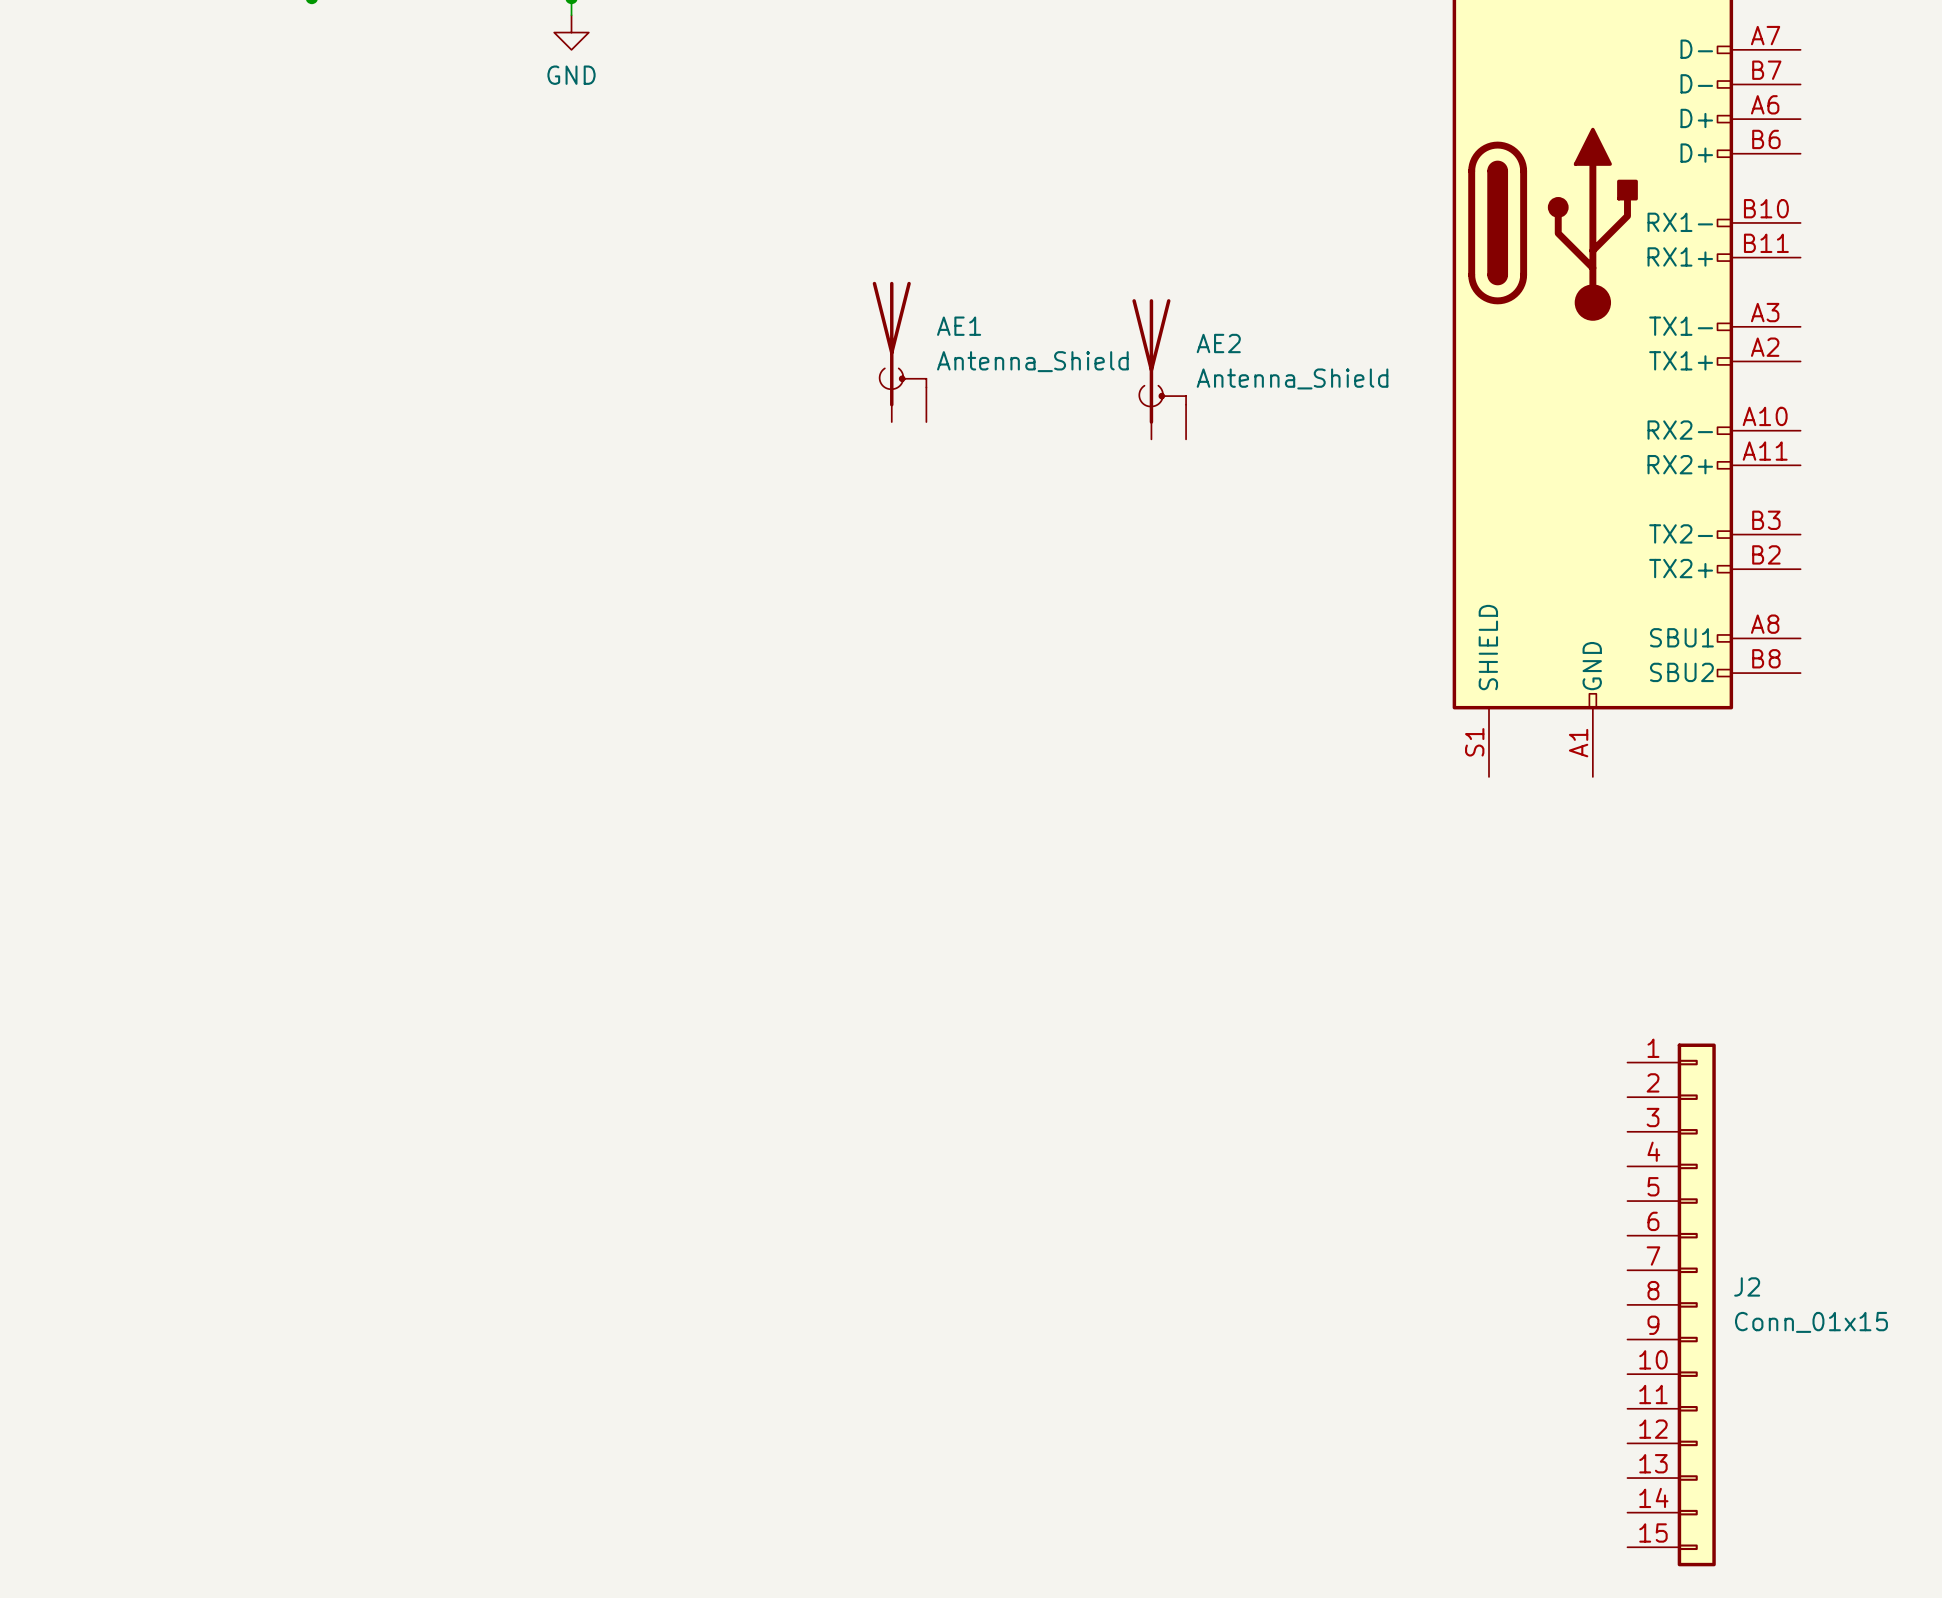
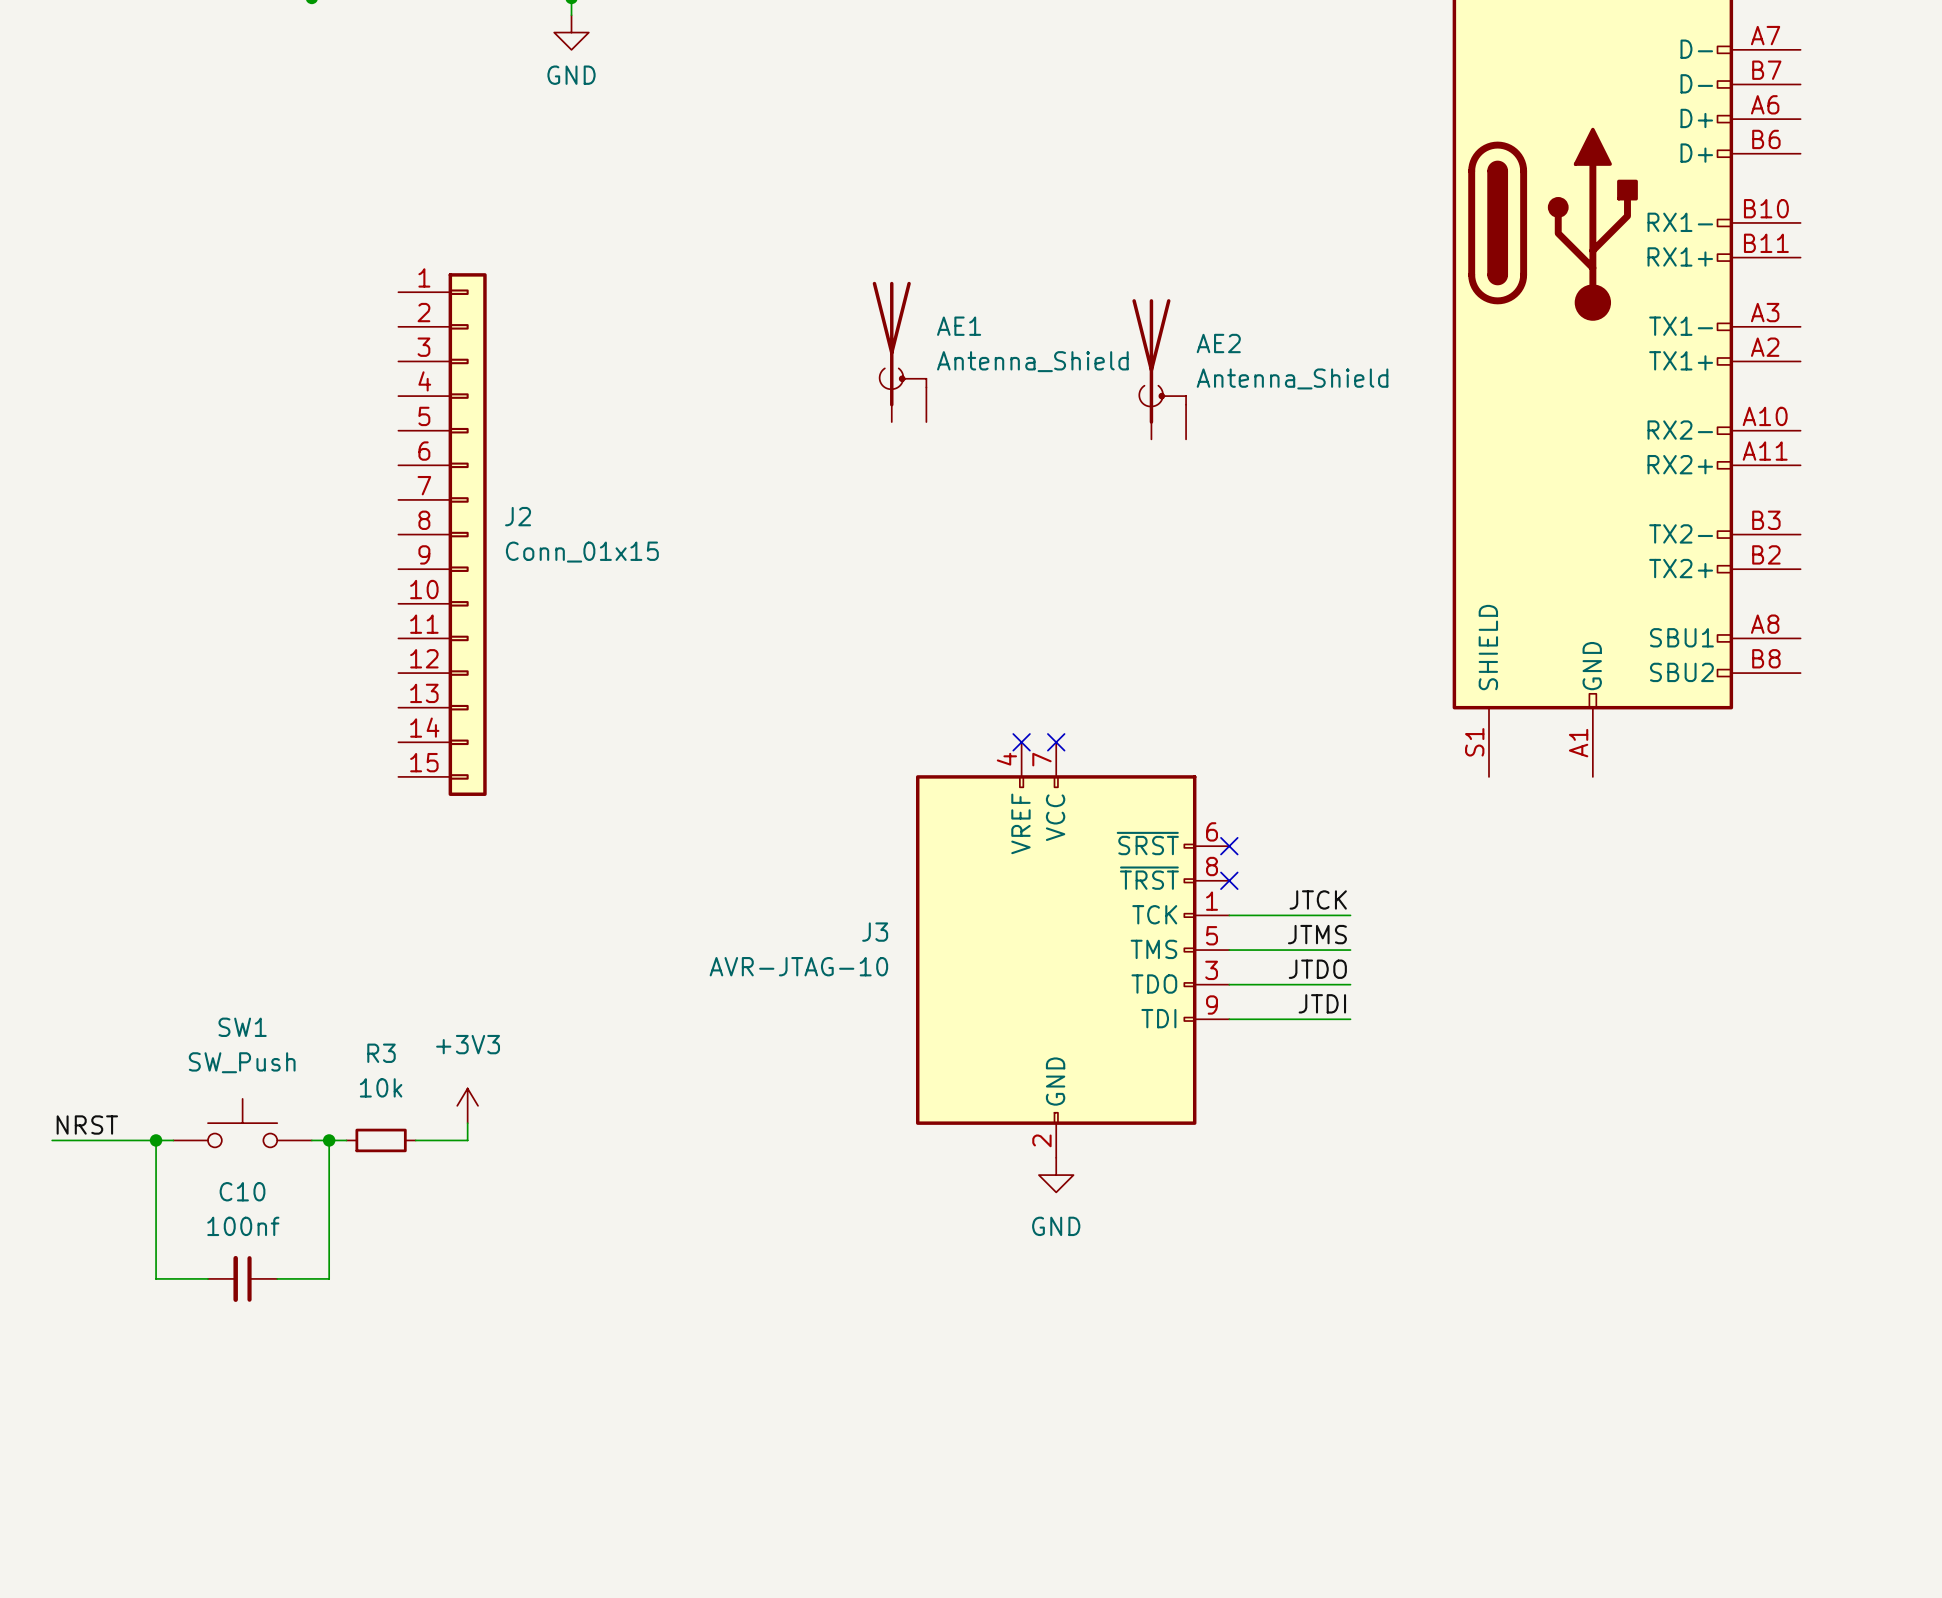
no-connect mark: none -> (1021, 742)
no-connect mark: none -> (1056, 742)
no-connect mark: none -> (1229, 846)
no-connect mark: none -> (1229, 880)
label: none -> JTCK (1318, 899)
wire: none -> (1229, 915) (1350, 915)
label: none -> JTMS (1317, 934)
J3: none -> AVR-JTAG-10 (1072, 950)
wire: none -> (1229, 950) (1350, 950)
label: none -> JTDO (1317, 969)
wire: none -> (1229, 984) (1350, 984)
label: none -> JTDI (1322, 1003)
wire: none -> (1229, 1019) (1350, 1019)
power symbol: none -> +3V3 (467, 1105)
SW1: none -> SW_Push (242, 1123)
wire: none -> (467, 1123) (467, 1140) (415, 1140)
label: none -> NRST (87, 1125)
wire: none -> (52, 1140) (173, 1140)
wire: none -> (156, 1140) (156, 1278) (207, 1278)
junction: none -> (156, 1140)
wire: none -> (311, 1140) (346, 1140)
wire: none -> (329, 1140) (329, 1278) (277, 1278)
junction: none -> (329, 1140)
R3: none -> 10k (381, 1140)
power symbol: none -> GND (1056, 1175)
C10: none -> 100nf (242, 1278)
J2 position: (1671, 1304) -> (442, 534)

